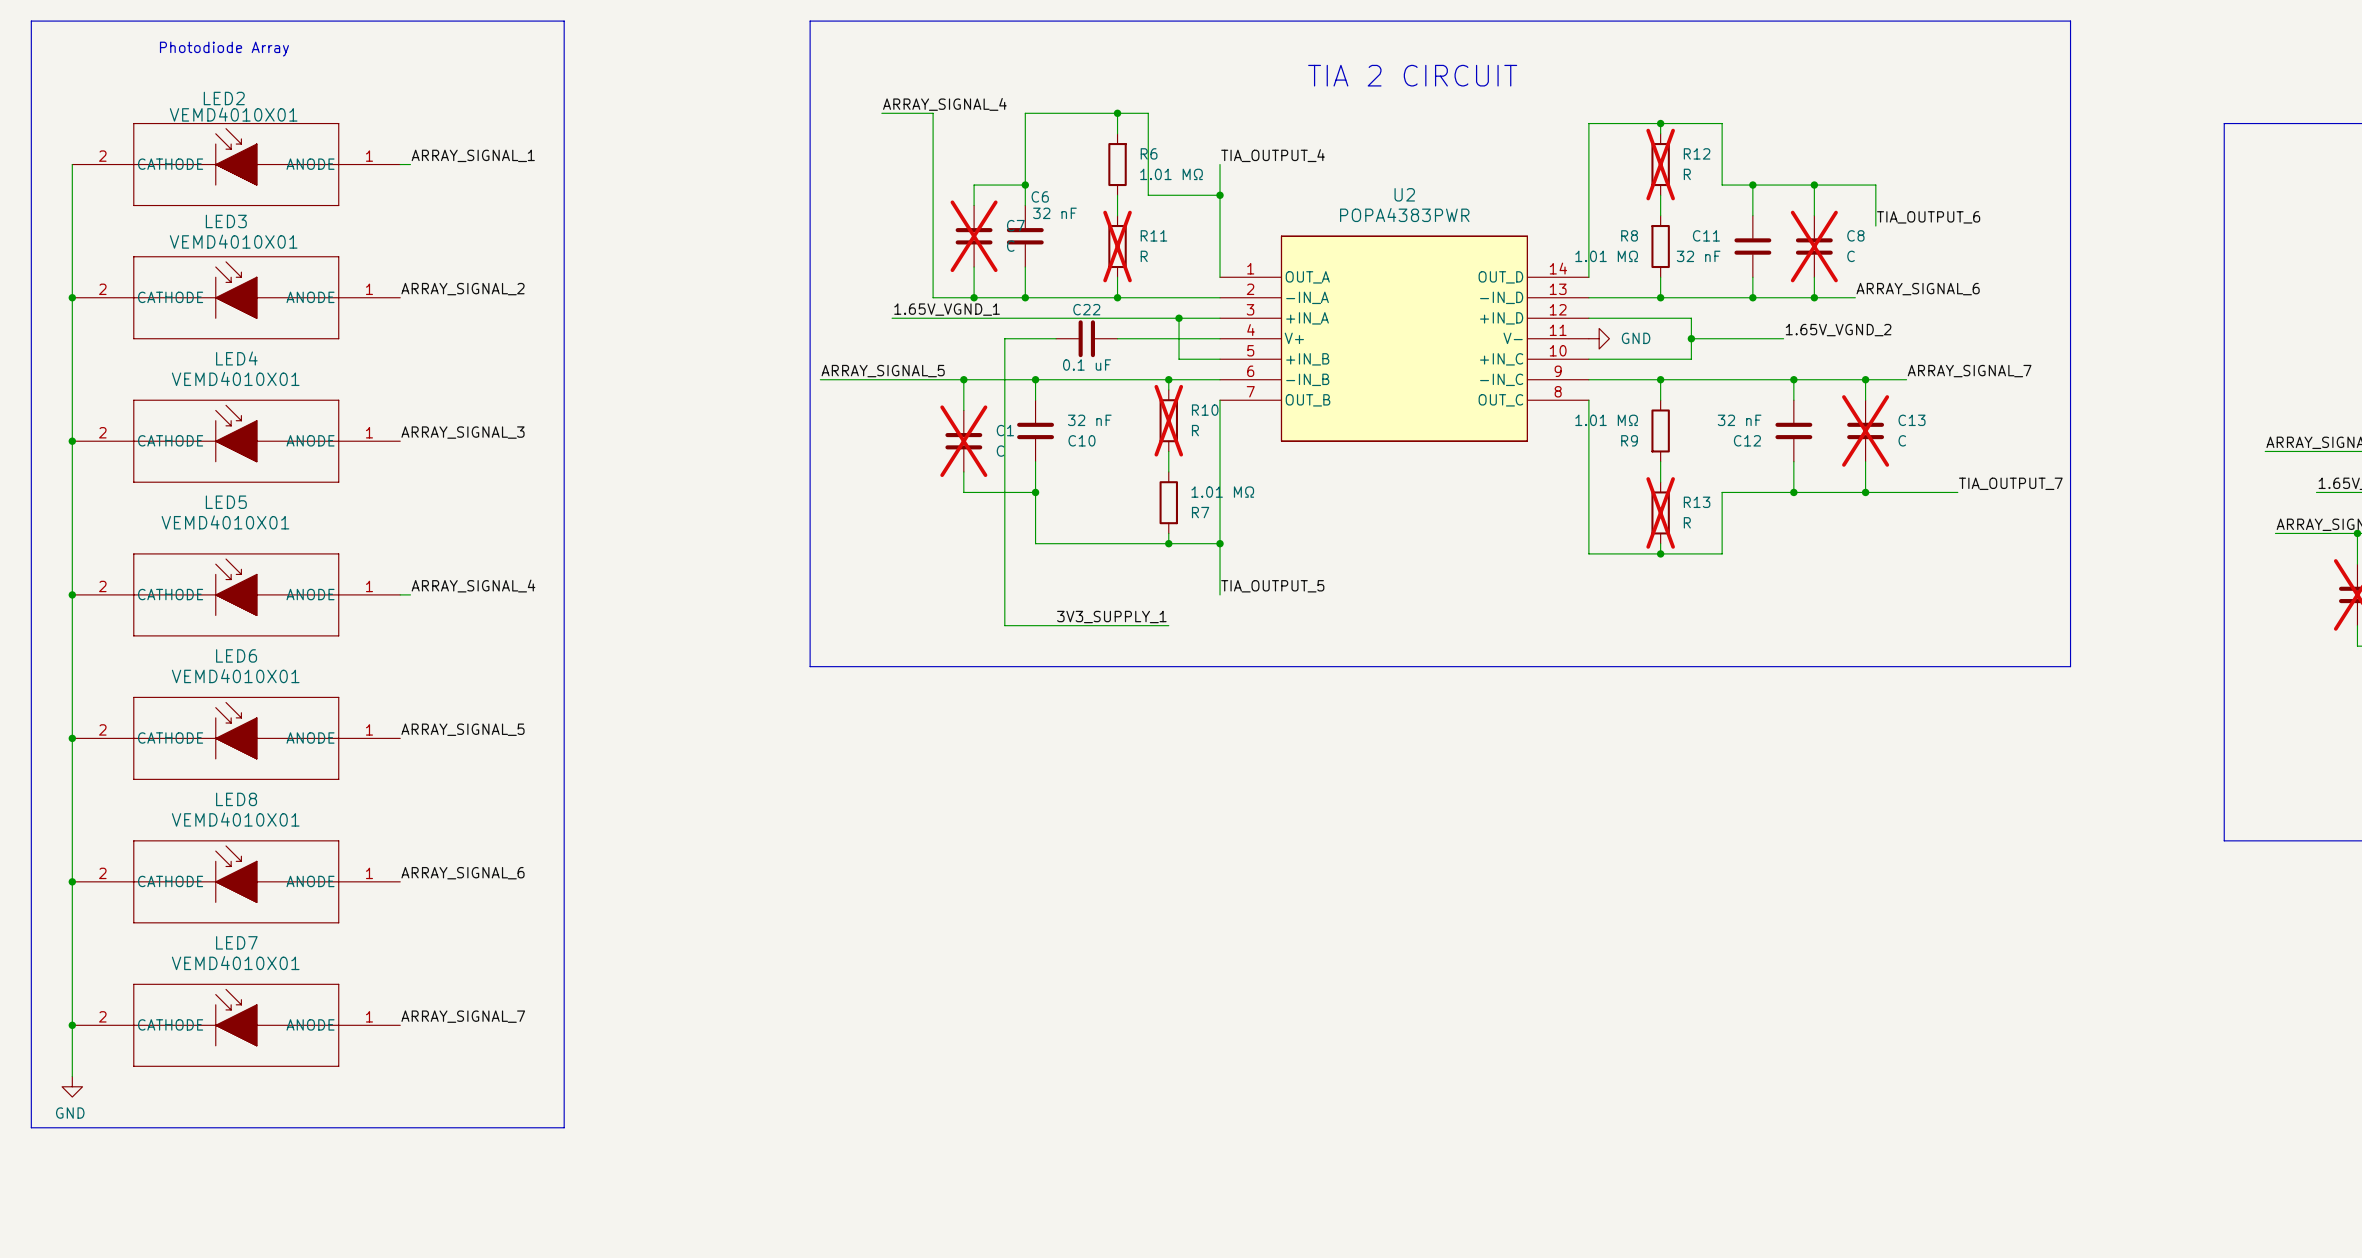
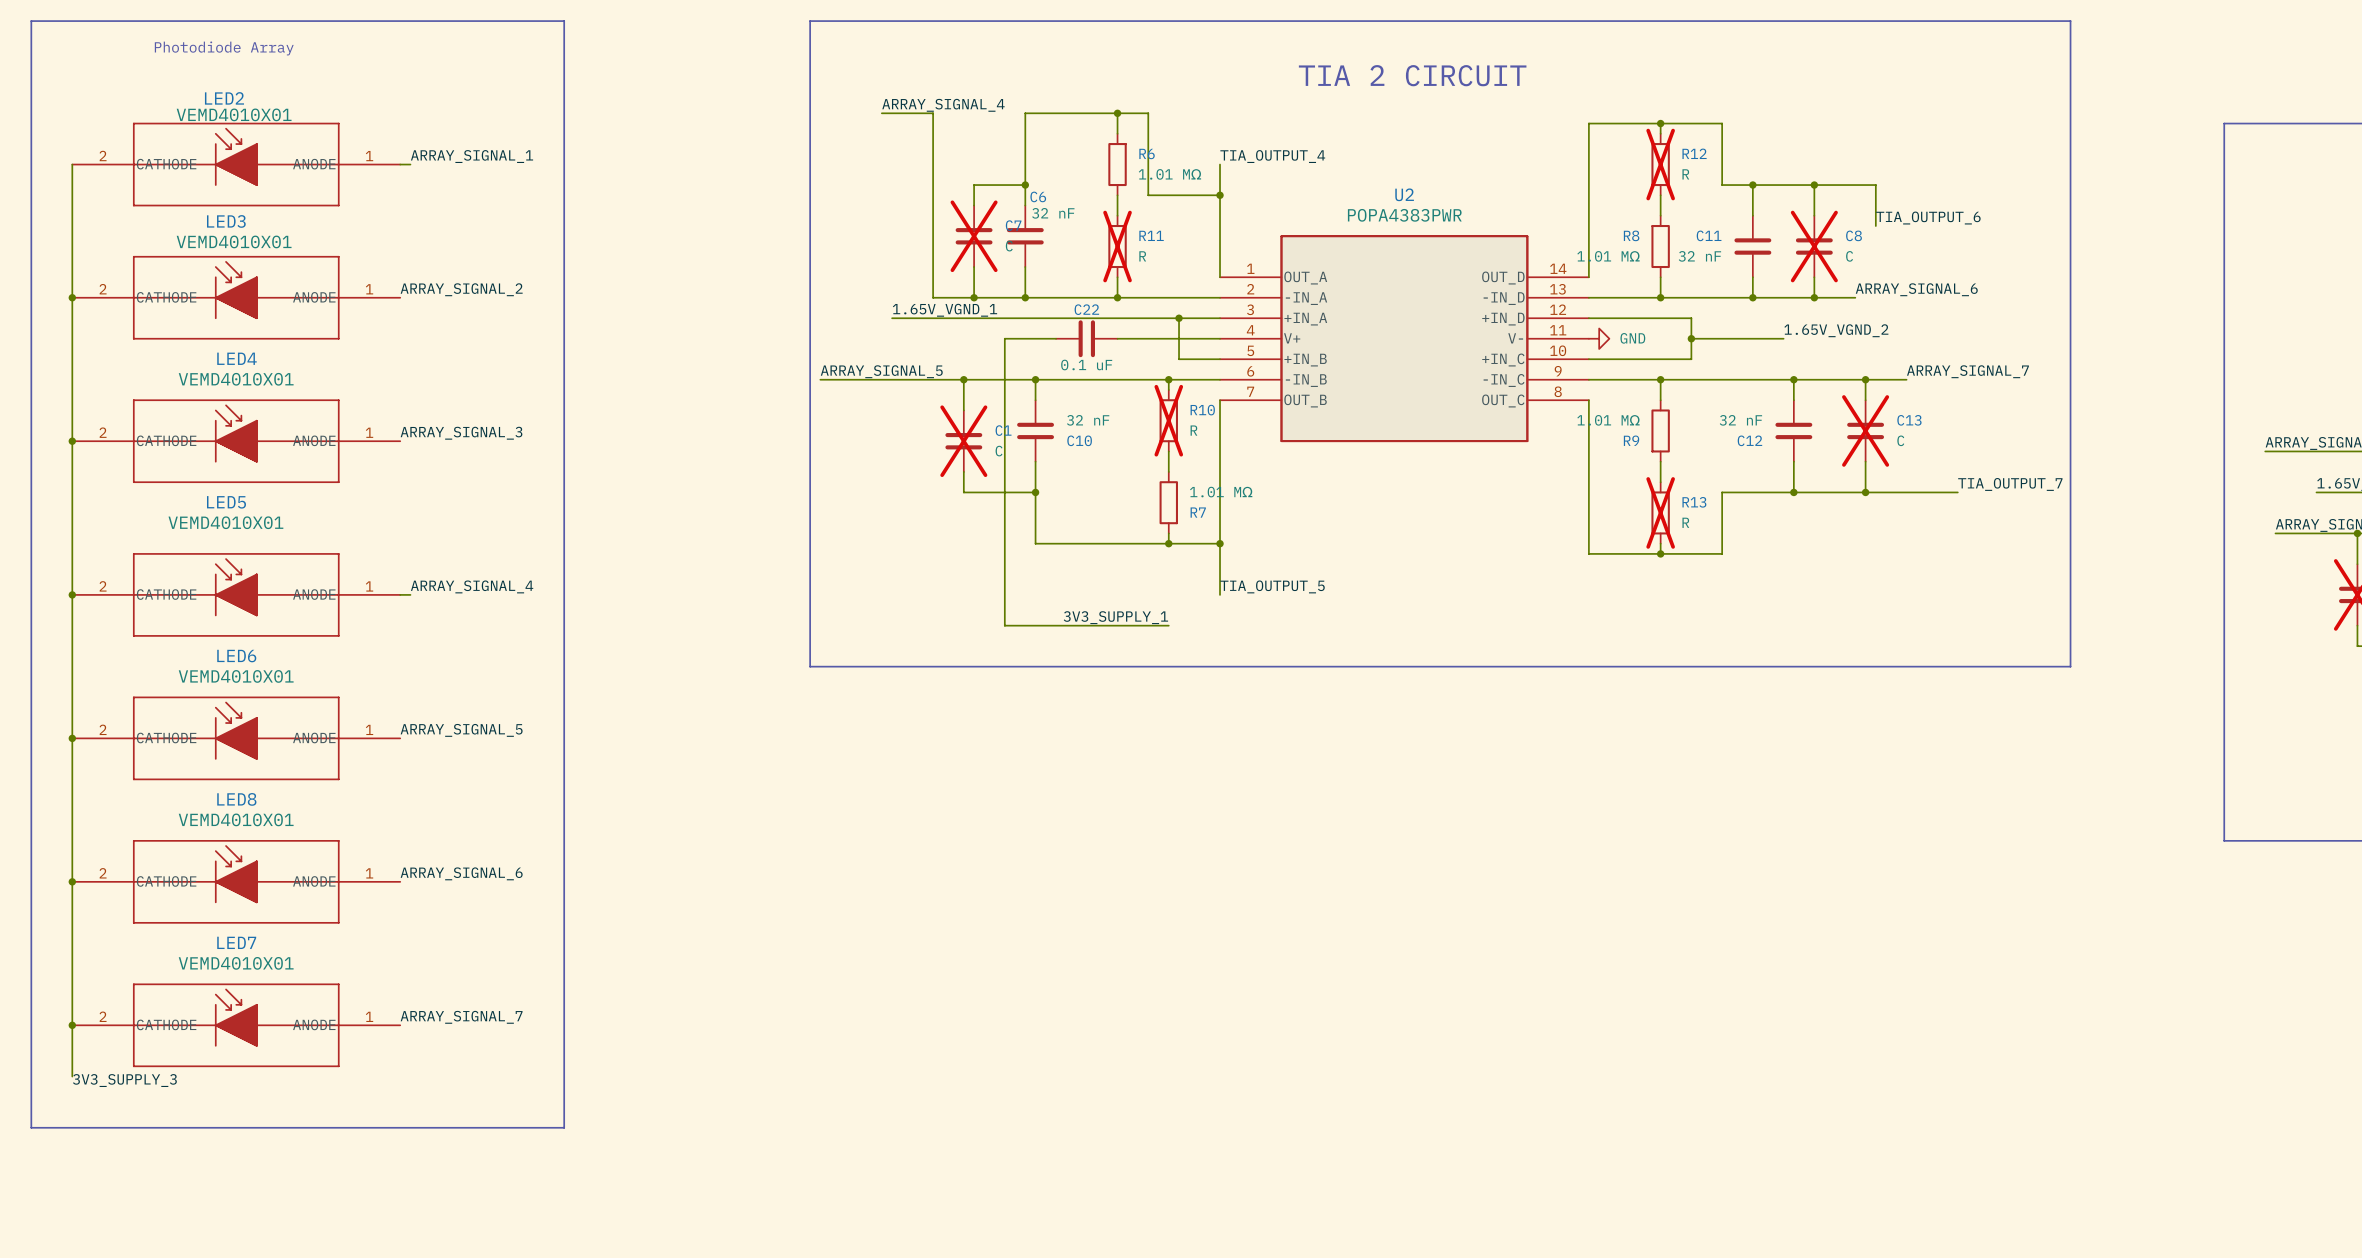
label: none -> 3V3_SUPPLY_3 (124, 1080)
power symbol: GND (72, 1086) -> none

